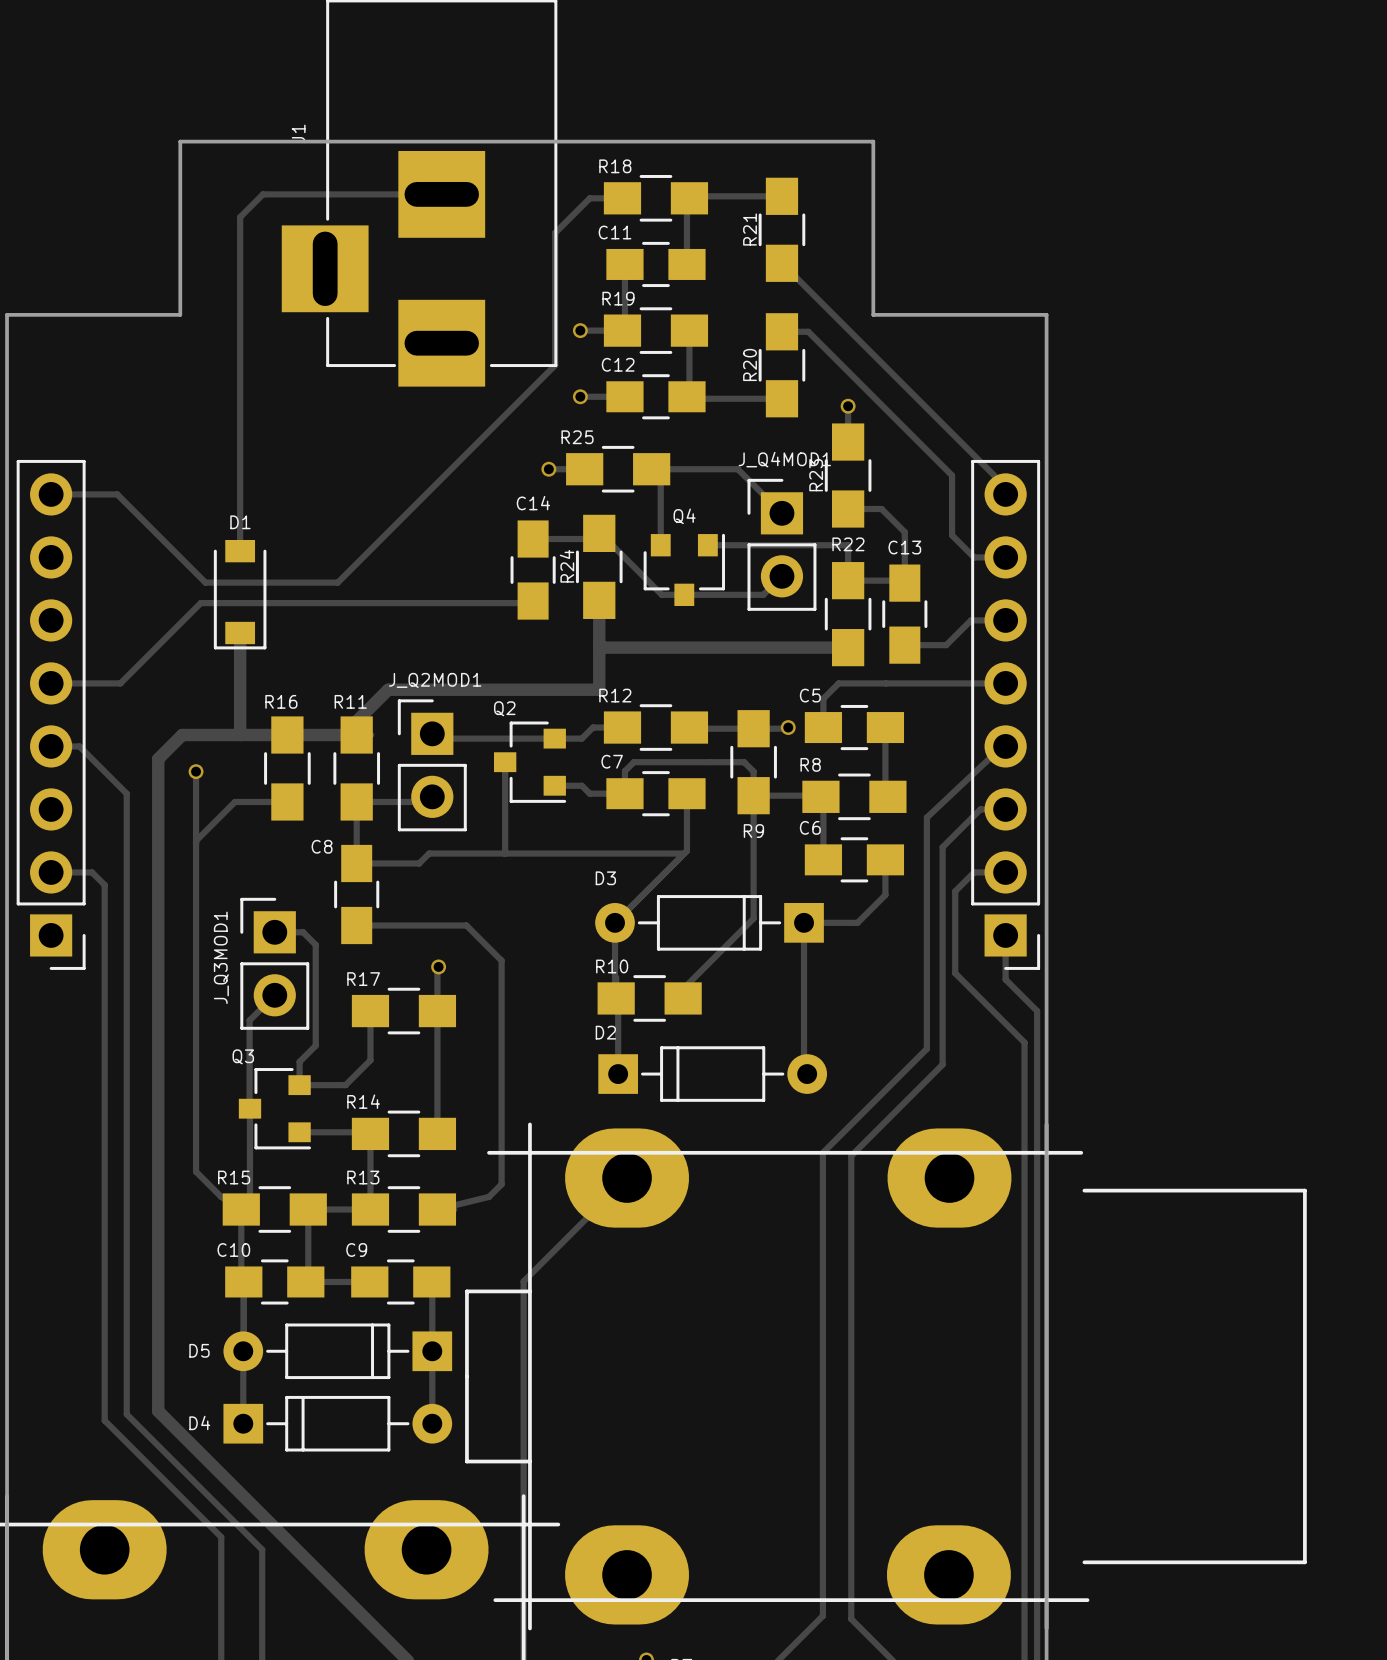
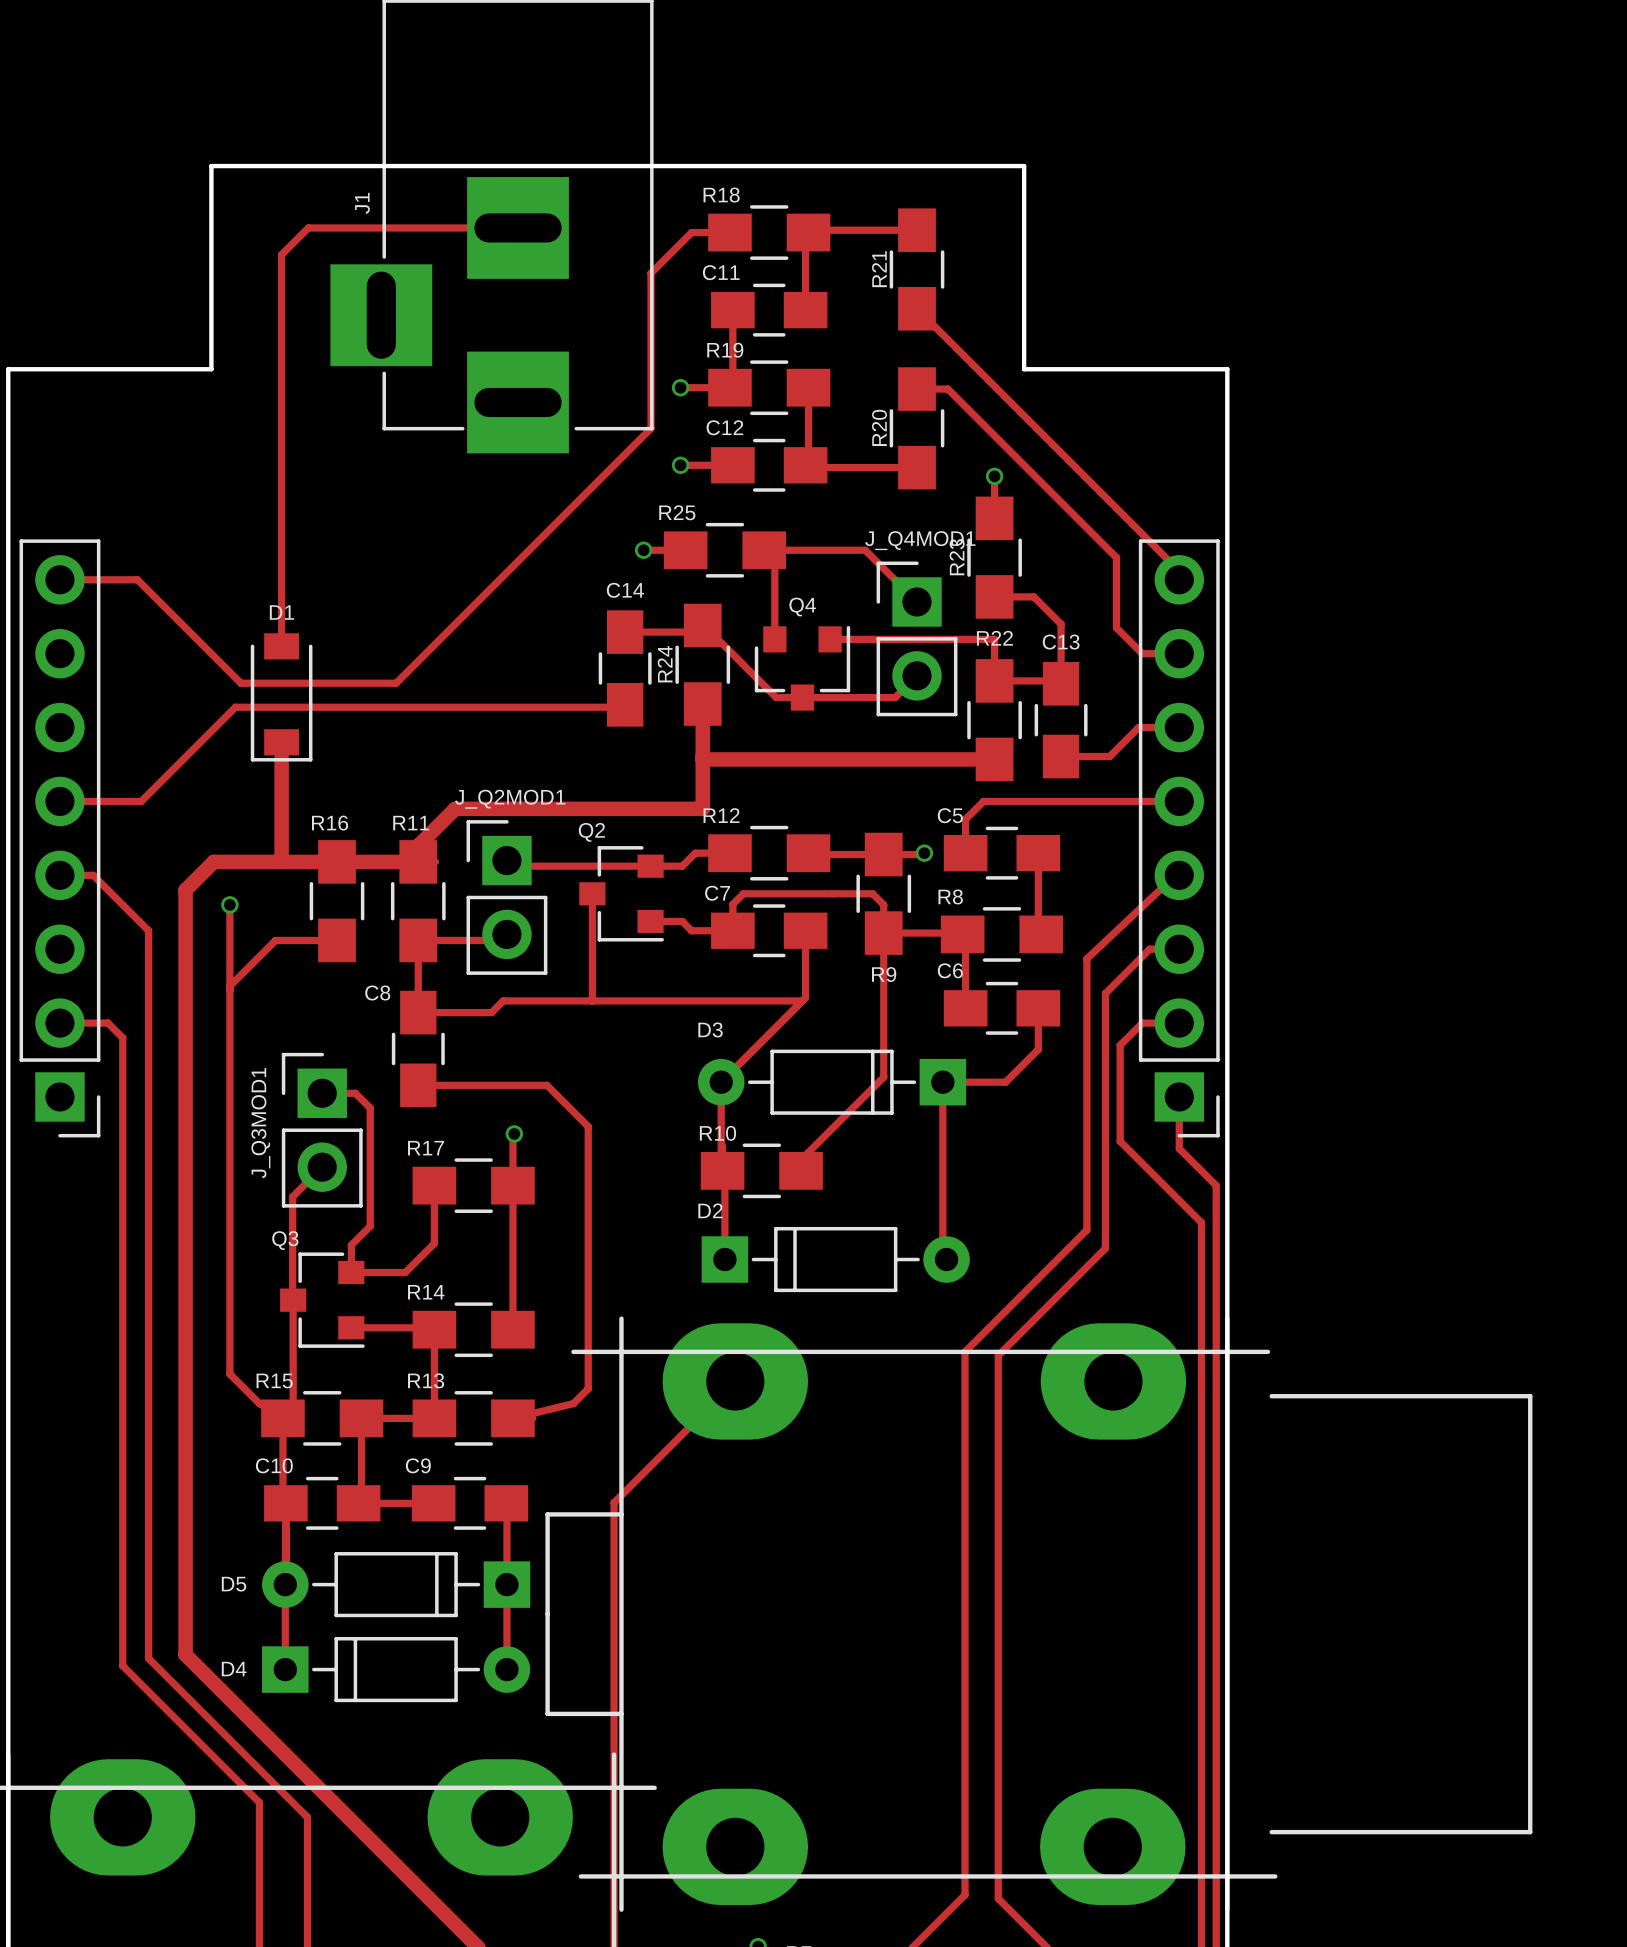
J1 name position: J1 (298, 133) -> J1 (362, 203)

